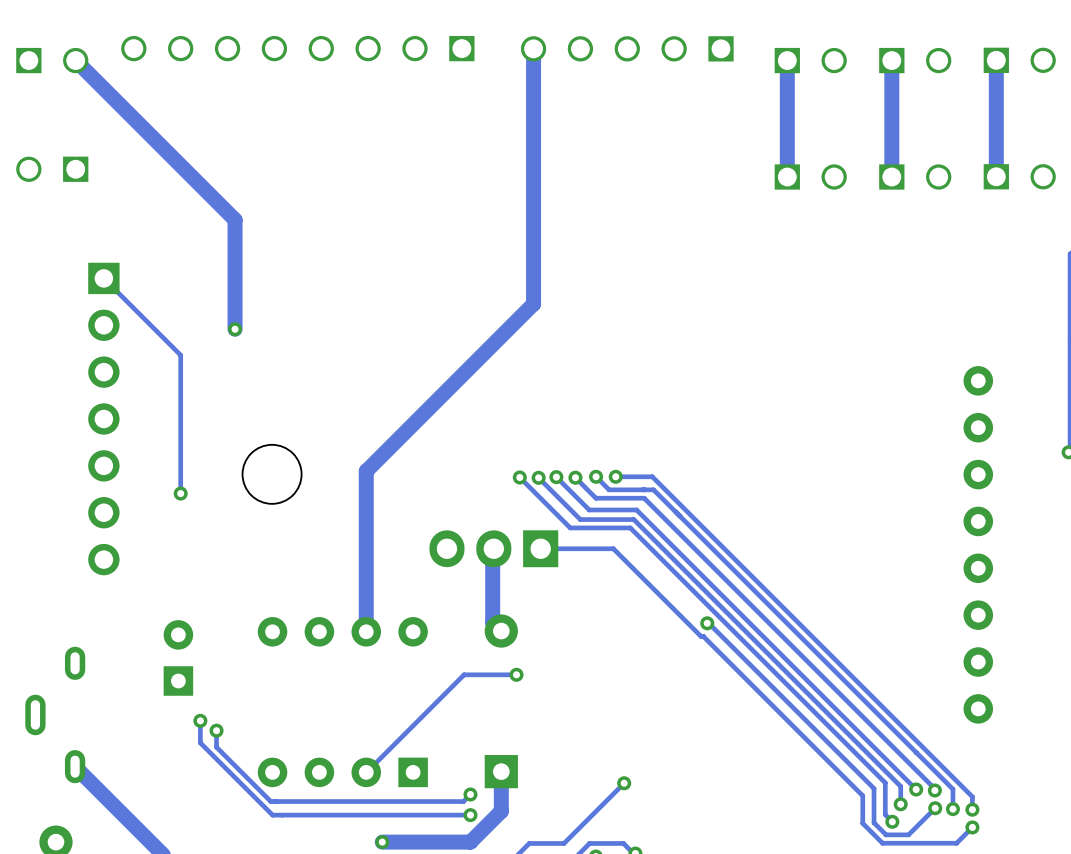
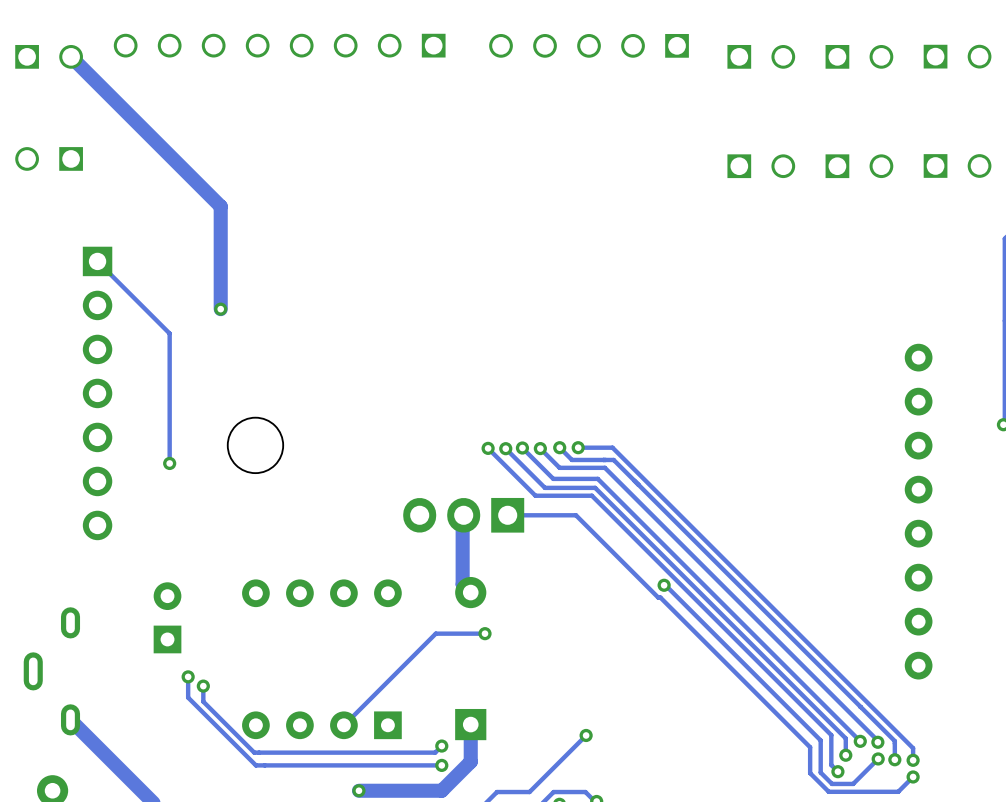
track: (533, 48) (533, 303) (366, 471) (366, 631) -> none
track: (787, 60) (787, 177) -> none
track: (891, 60) (891, 177) -> none
track: (996, 60) (996, 176) -> none

